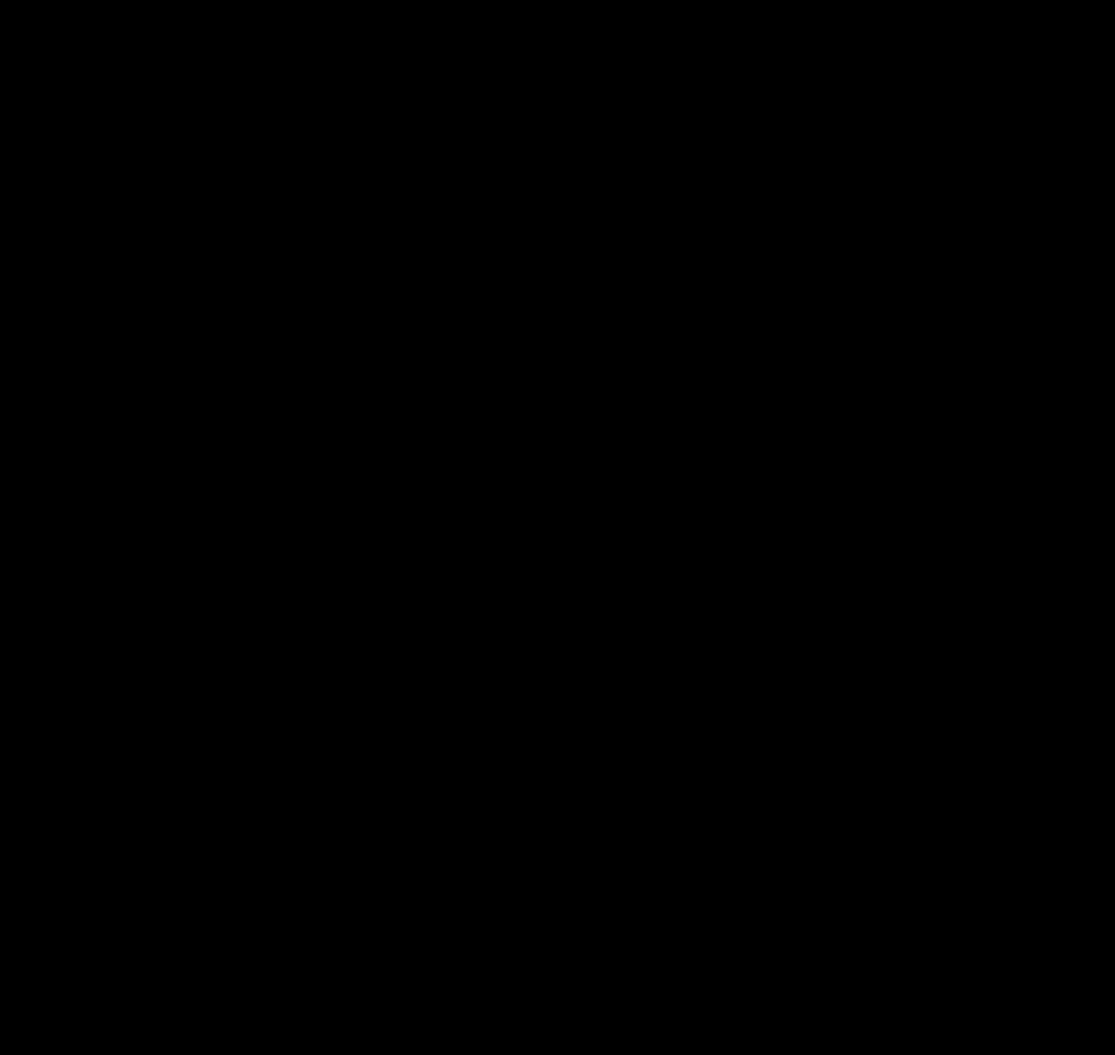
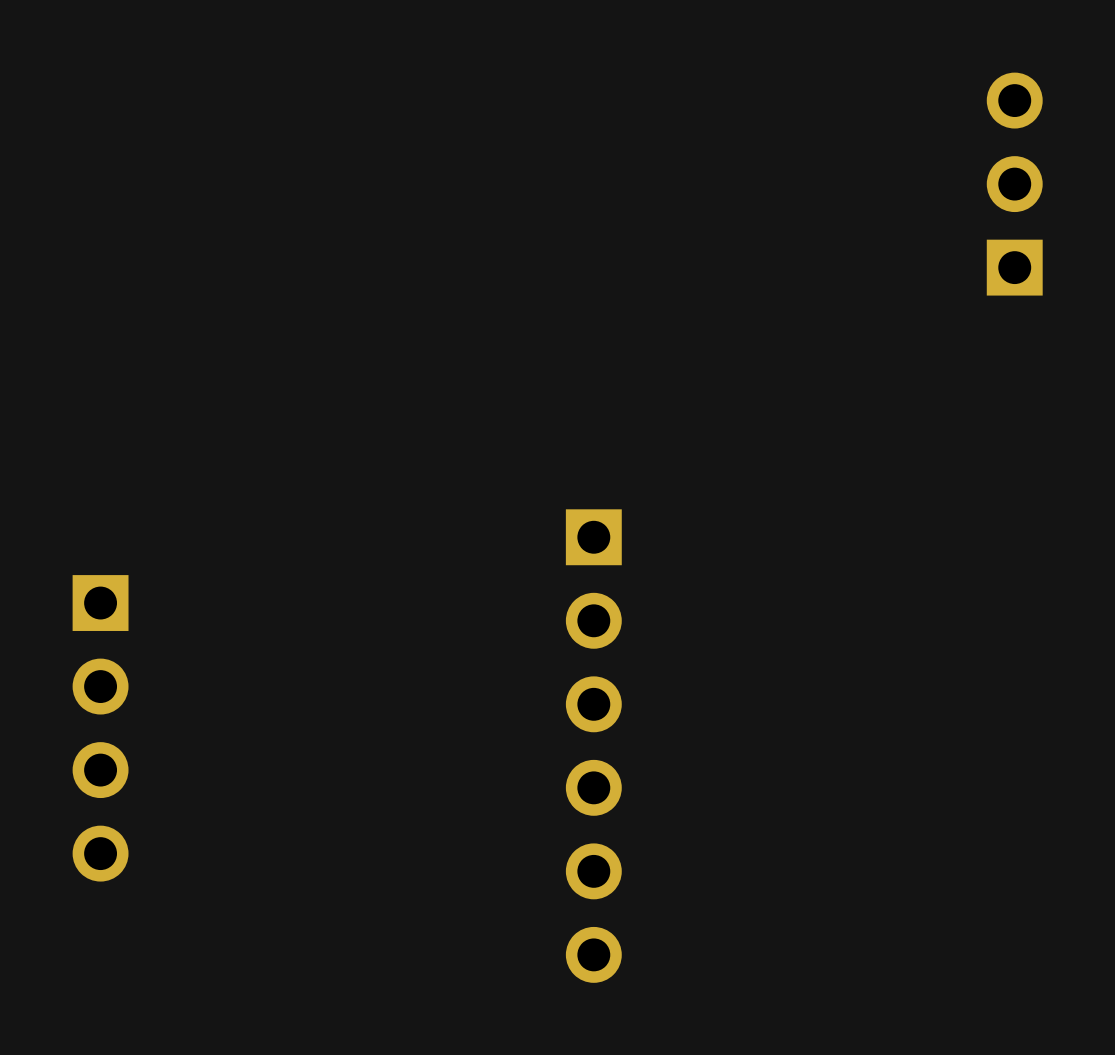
part: none -> (1014, 184)
part: none -> (100, 728)
part: none -> (593, 746)

